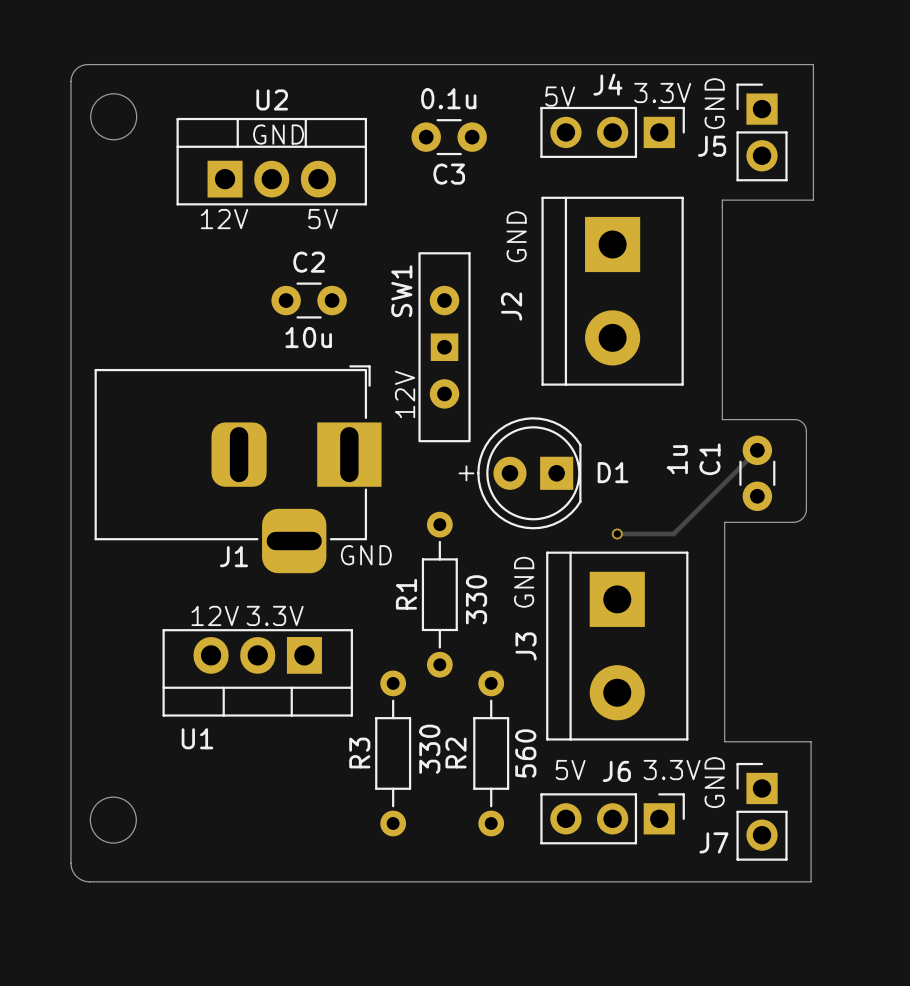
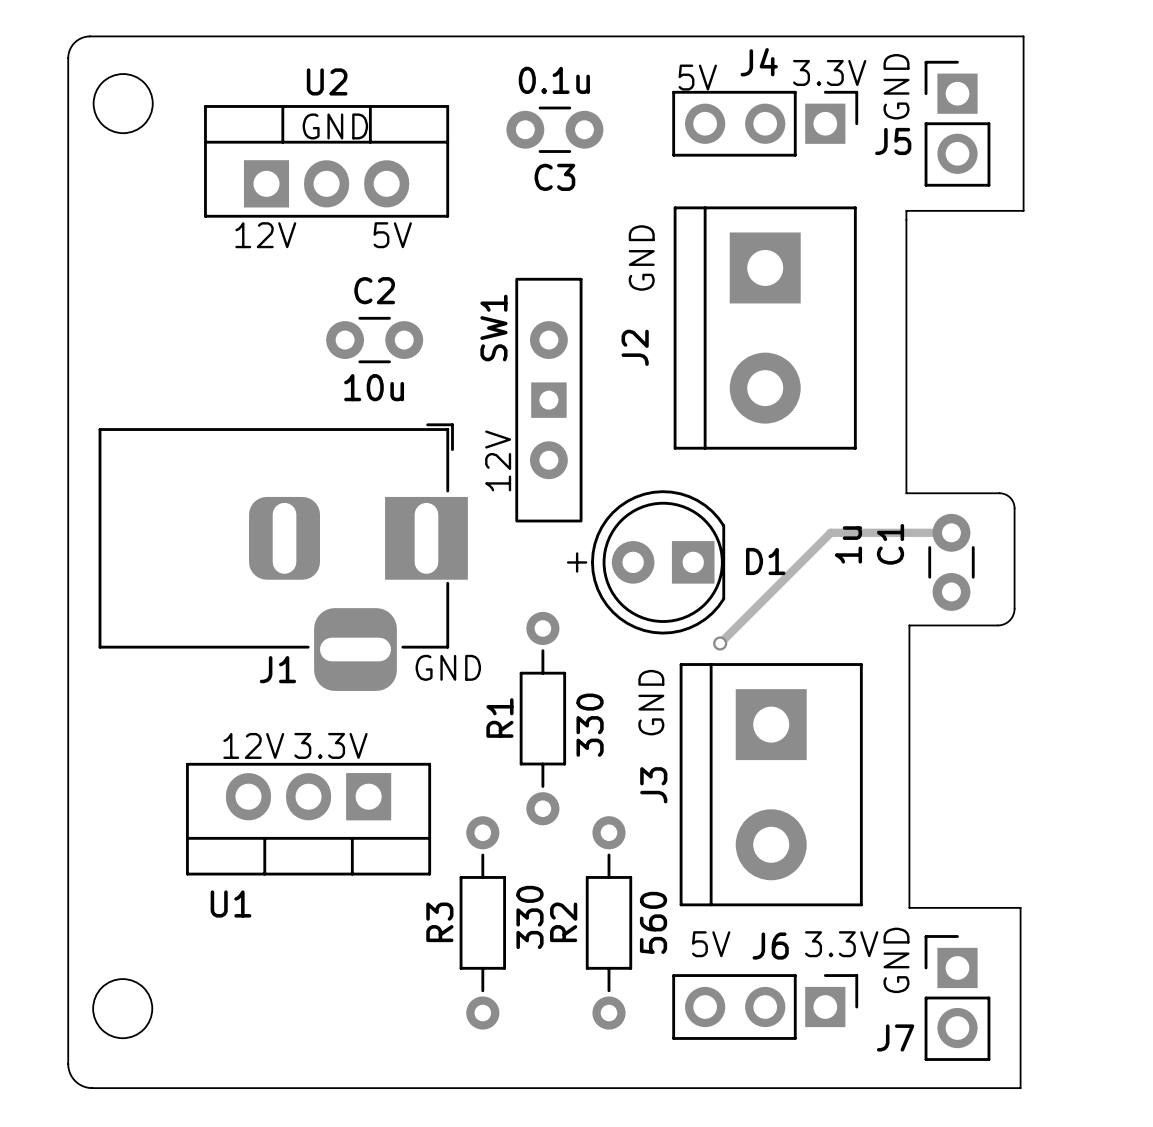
track: (757, 450) (673, 533) (617, 533) -> (951, 532) (830, 532) (720, 643)
via position: (617, 533) -> (720, 643)

